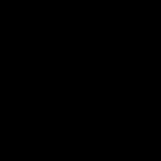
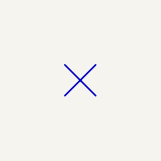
no-connect mark: none -> (80, 80)

